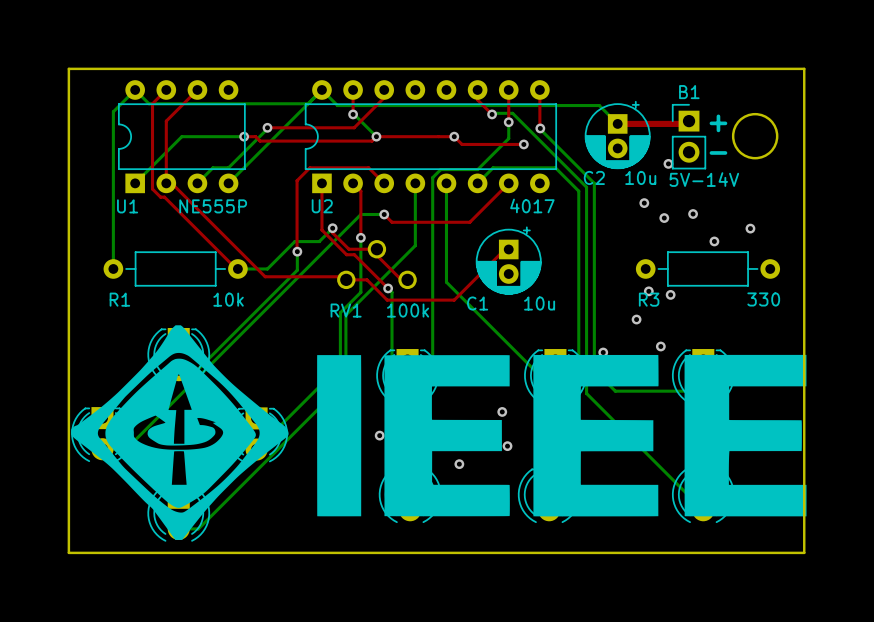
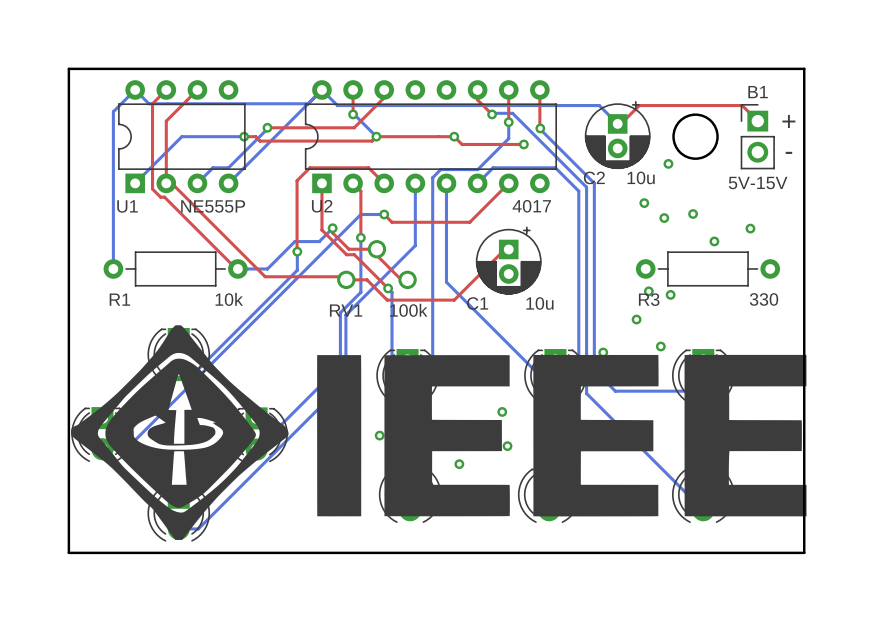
top track: (689, 121) (686, 123) (617, 123) -> none
top track: none -> (757, 121) (742, 105) (639, 105) (617, 127)
text position: + (718, 123) -> + (788, 121)
B1 position: (689, 136) -> (757, 136)
round board edge position: (755, 136) -> (695, 136)
text position: - (718, 152) -> - (788, 152)
B1 value: 5V-14V (704, 179) -> 5V-15V (758, 183)

